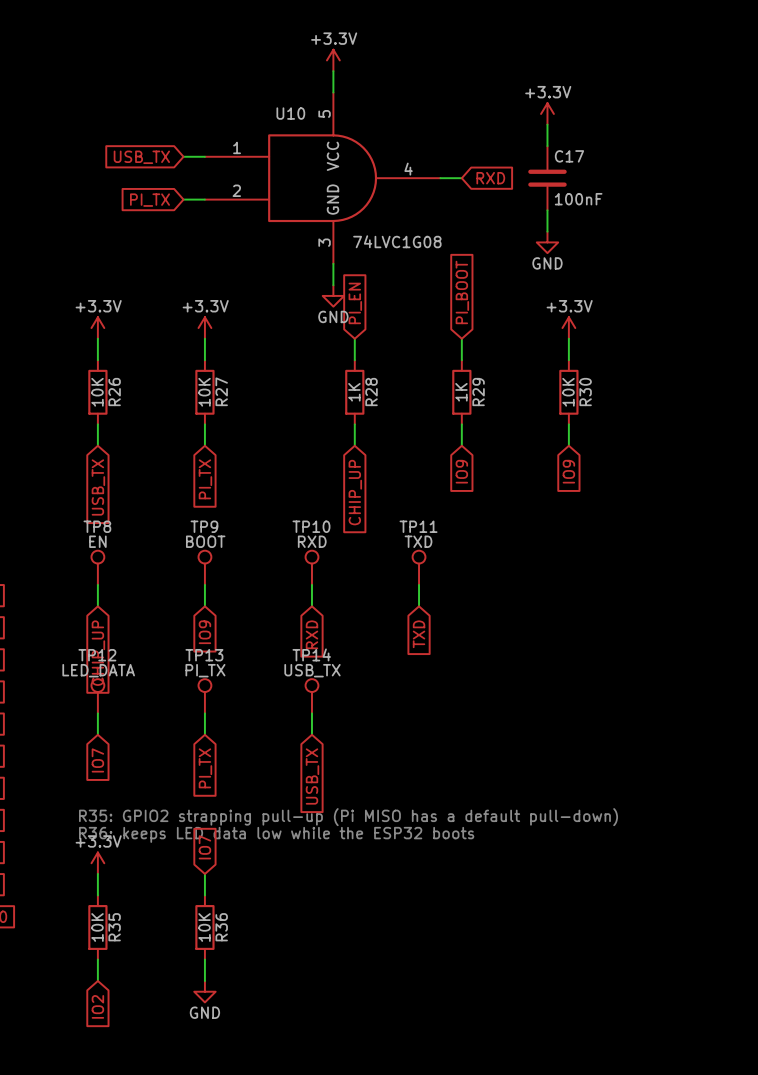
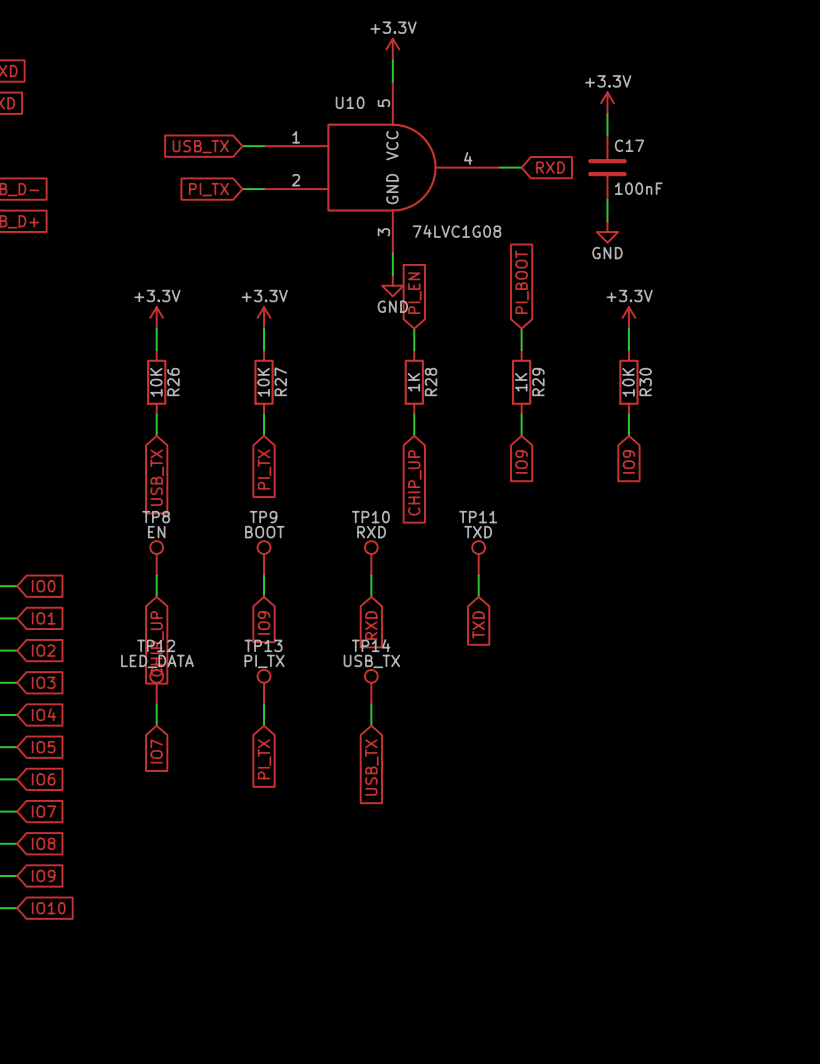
text: R35: GPIO2 strapping pull-up (Pi MISO has a default pull-down) (348, 817) -> none
text: R36: keeps LED data low while the ESP32 boots (276, 834) -> none
global label: IO7 (204, 847) -> none
power symbol: +3.3V (97, 863) -> none
wire: (97, 873) (97, 895) -> none
wire: (204, 873) (204, 895) -> none
R35: 10K (97, 927) -> none
R36: 10K (204, 927) -> none
wire: (97, 959) (97, 981) -> none
wire: (204, 959) (204, 981) -> none
power symbol: GND (204, 991) -> none
global label: IO2 (97, 1006) -> none

